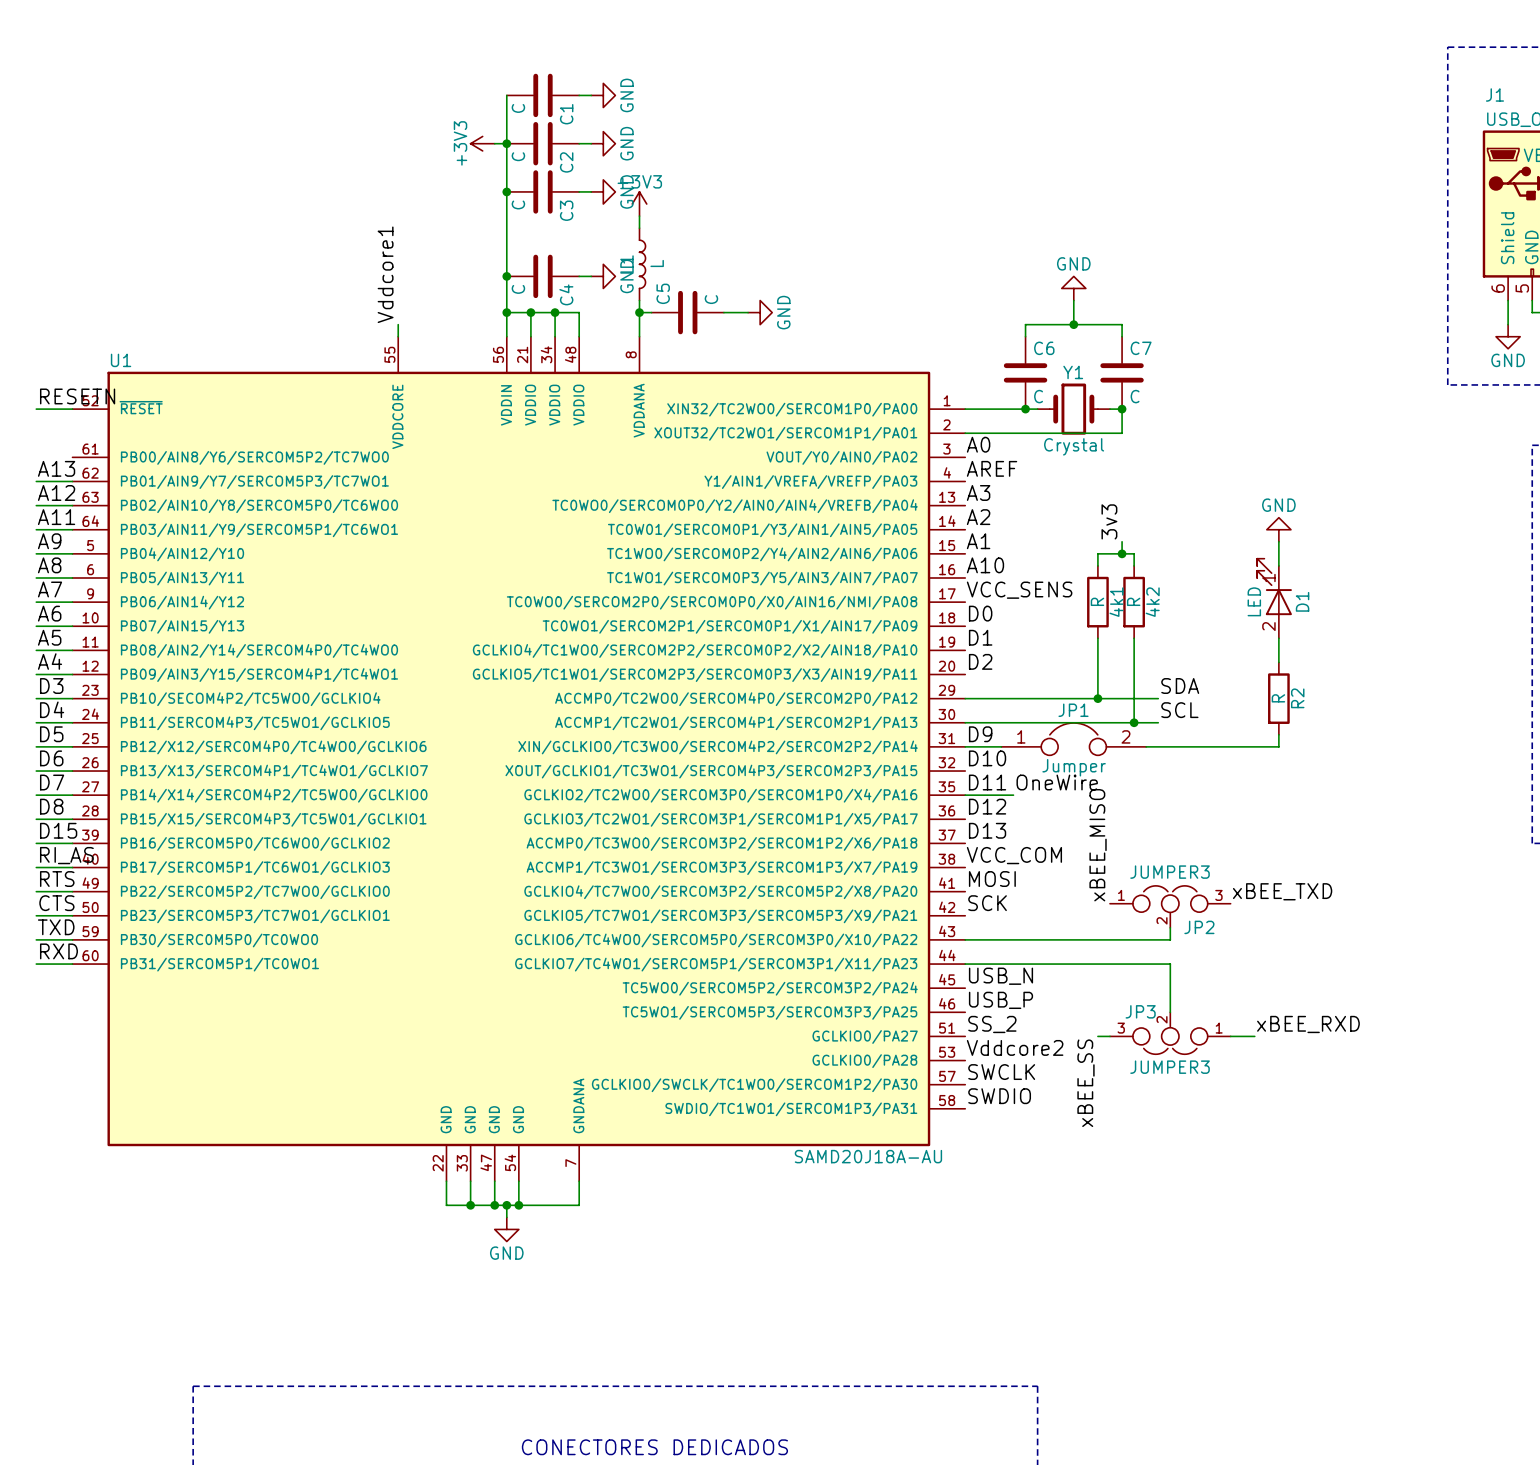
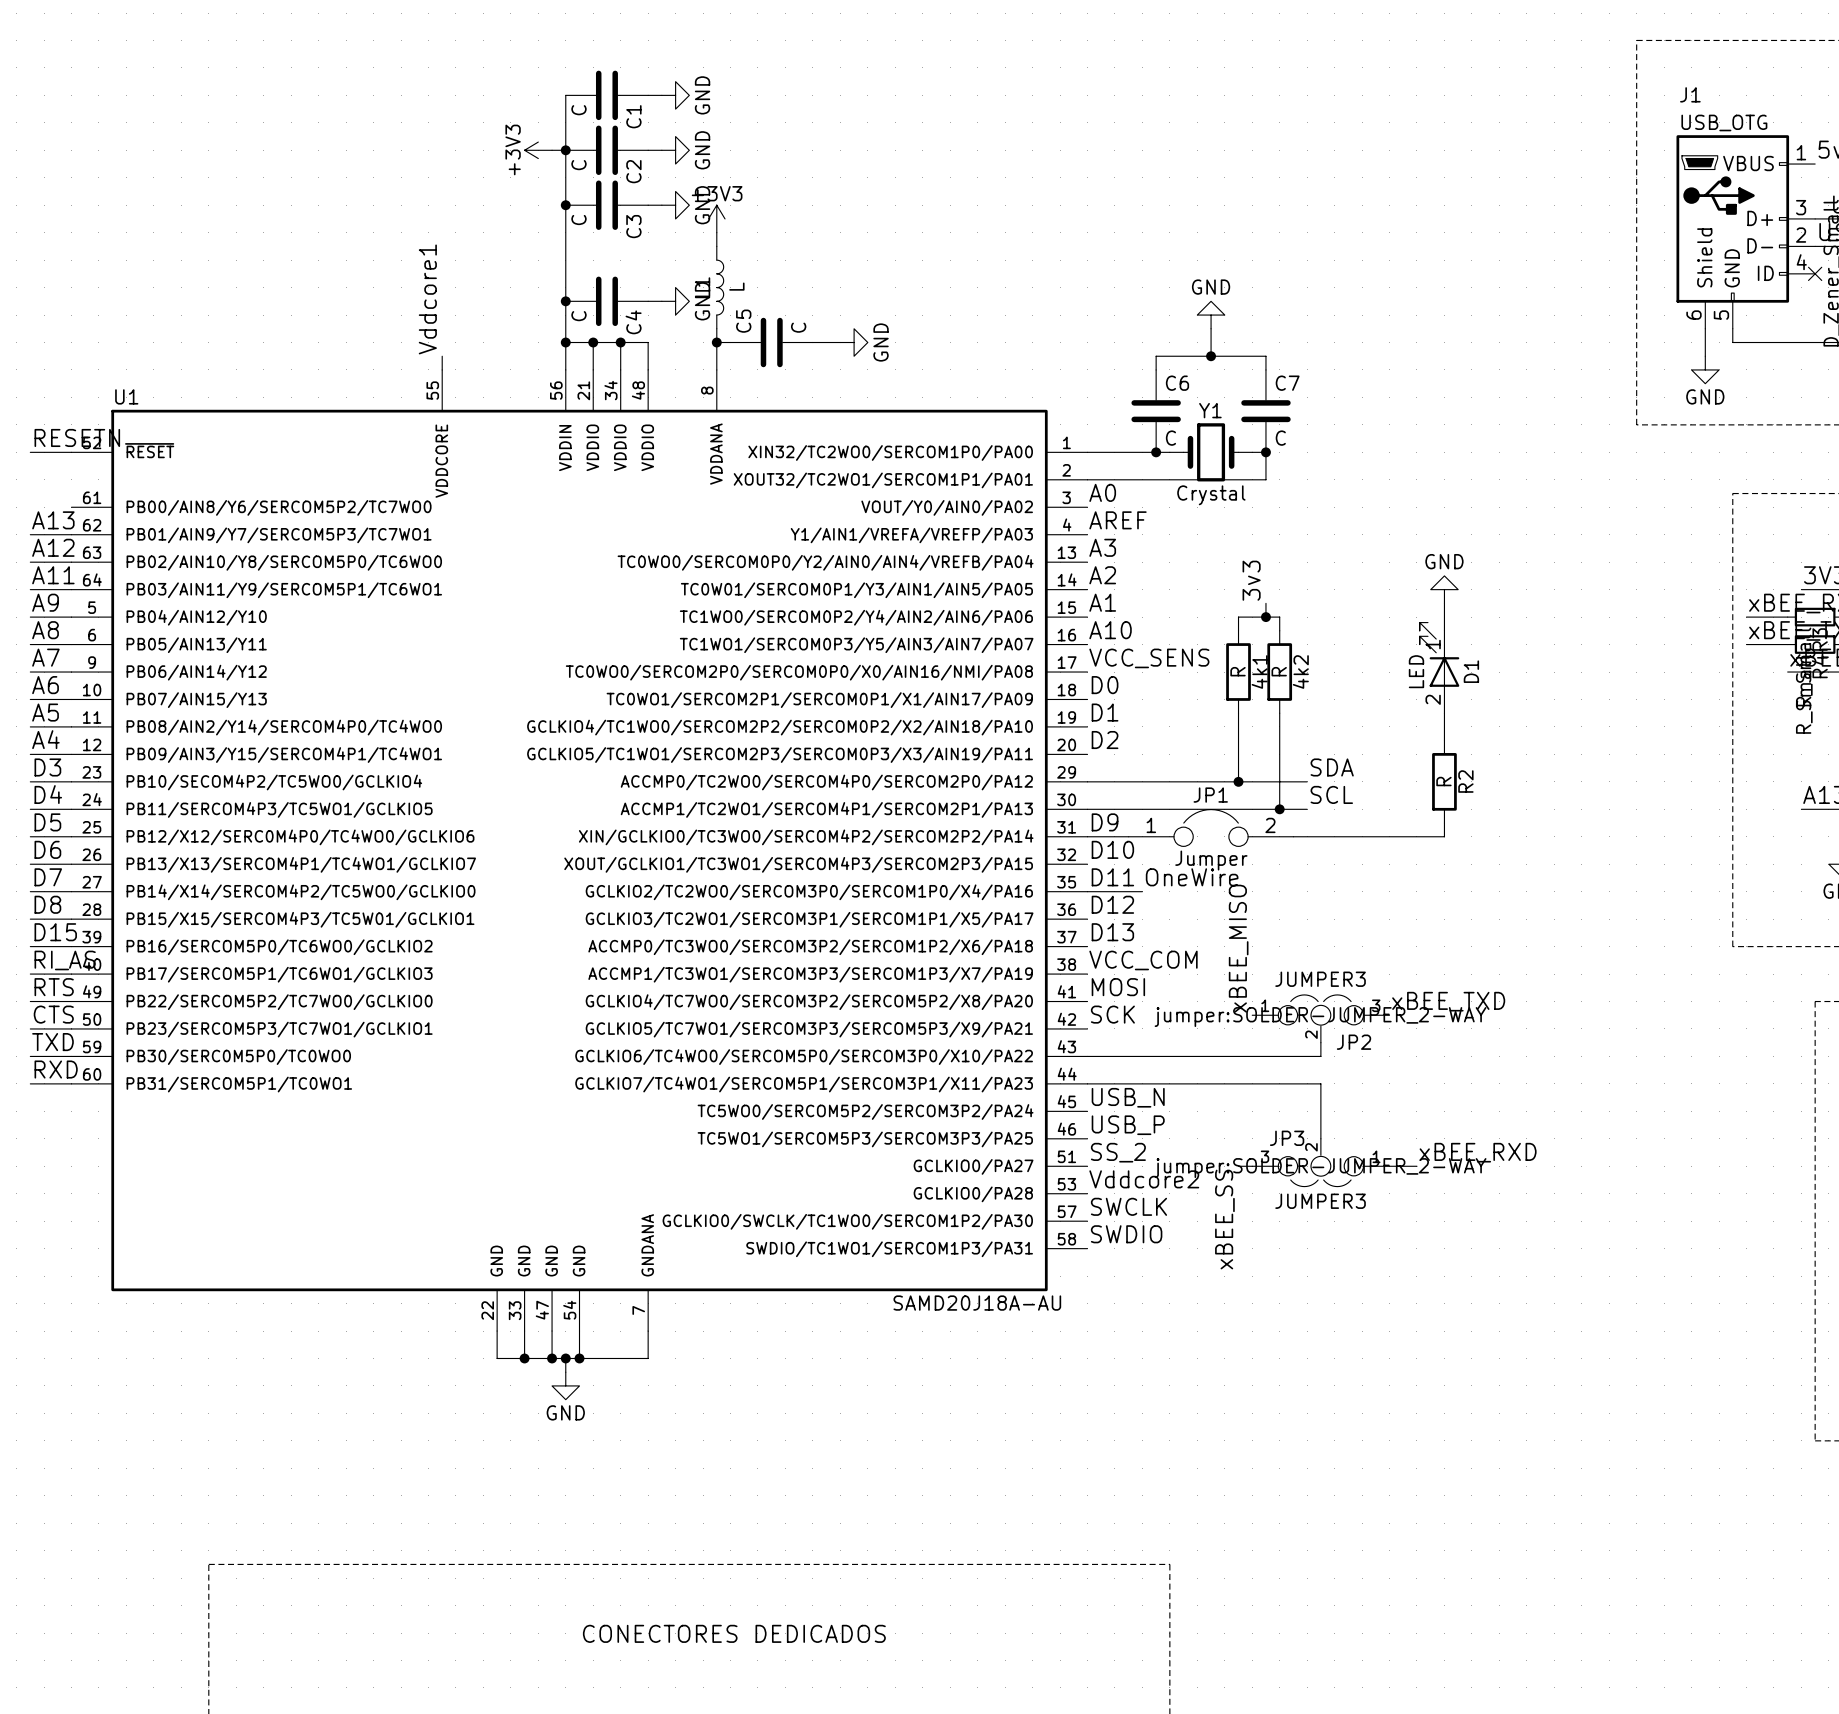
JP2 text: none -> jumper:SOLDER-JUMPER_2-WAY (1320, 1017)
JP3 text: none -> jumper:SOLDER-JUMPER_2-WAY (1320, 1168)

